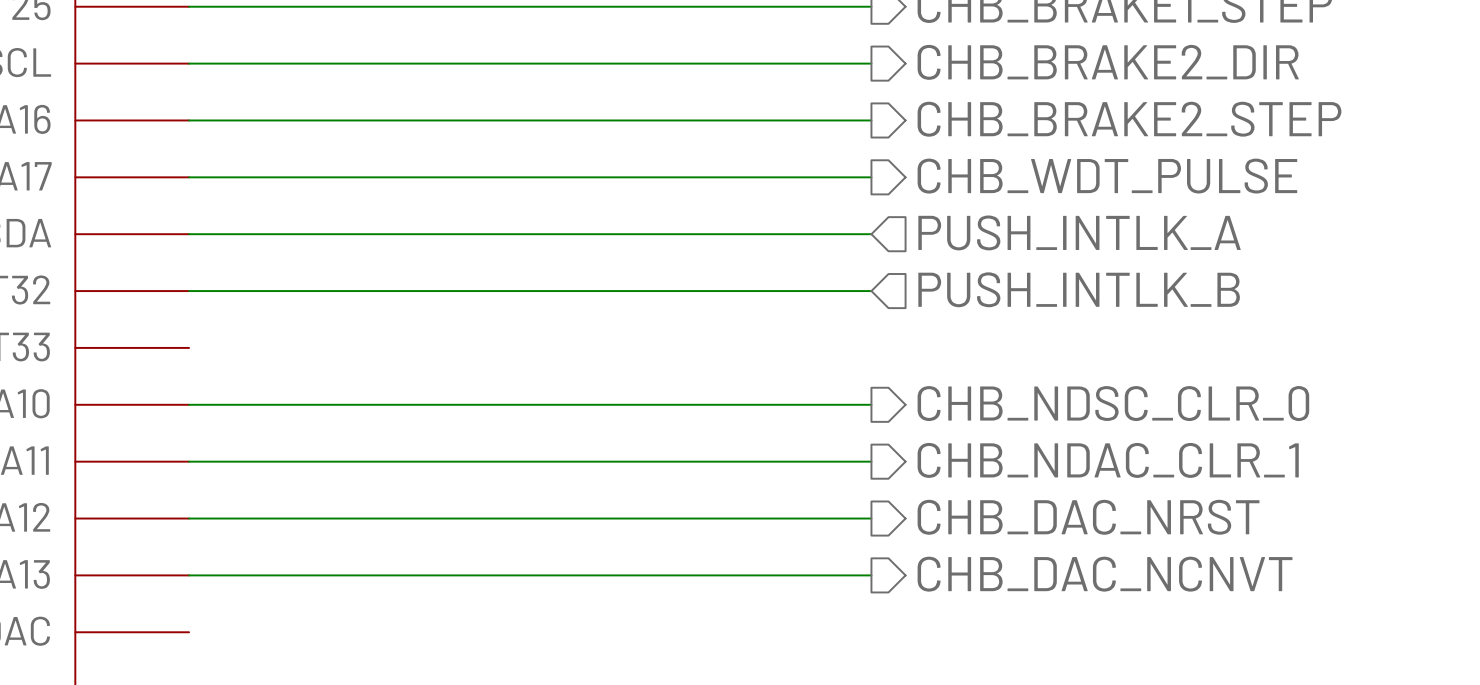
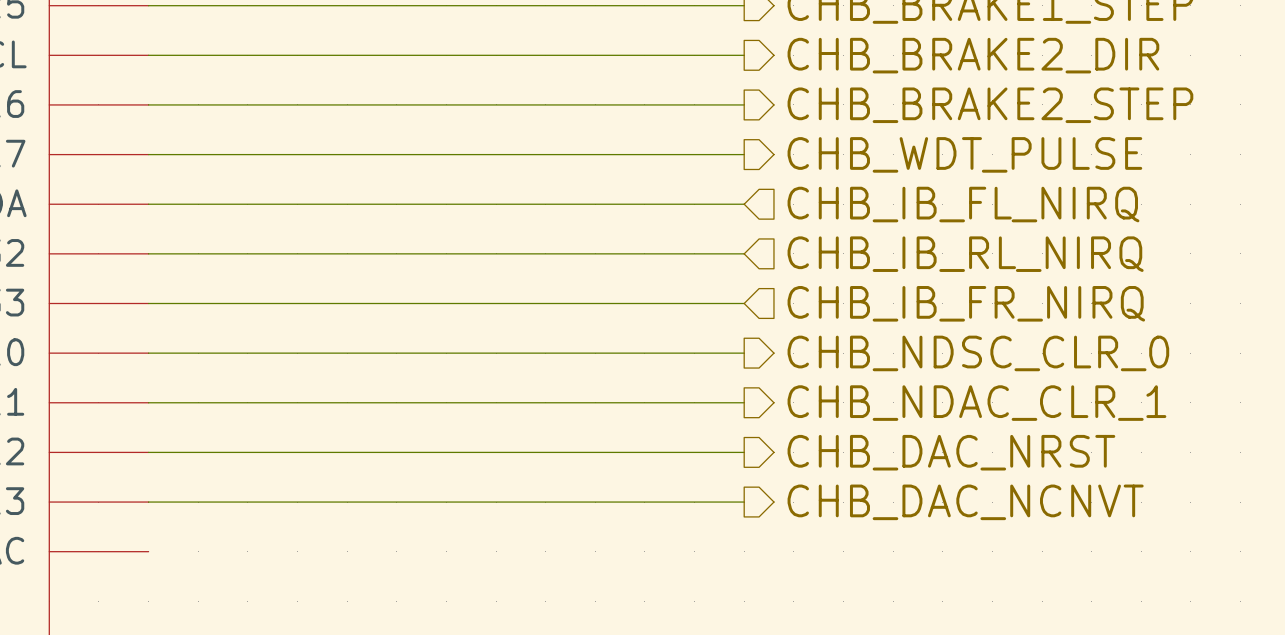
hierarchical label: PUSH_INTLK_A (1079, 232) -> CHB_IB_FL_NIRQ (963, 204)
hierarchical label: PUSH_INTLK_B (1079, 289) -> CHB_IB_RL_NIRQ (965, 254)
wire: none -> (148, 303) (744, 303)
hierarchical label: none -> CHB_IB_FR_NIRQ (966, 303)

